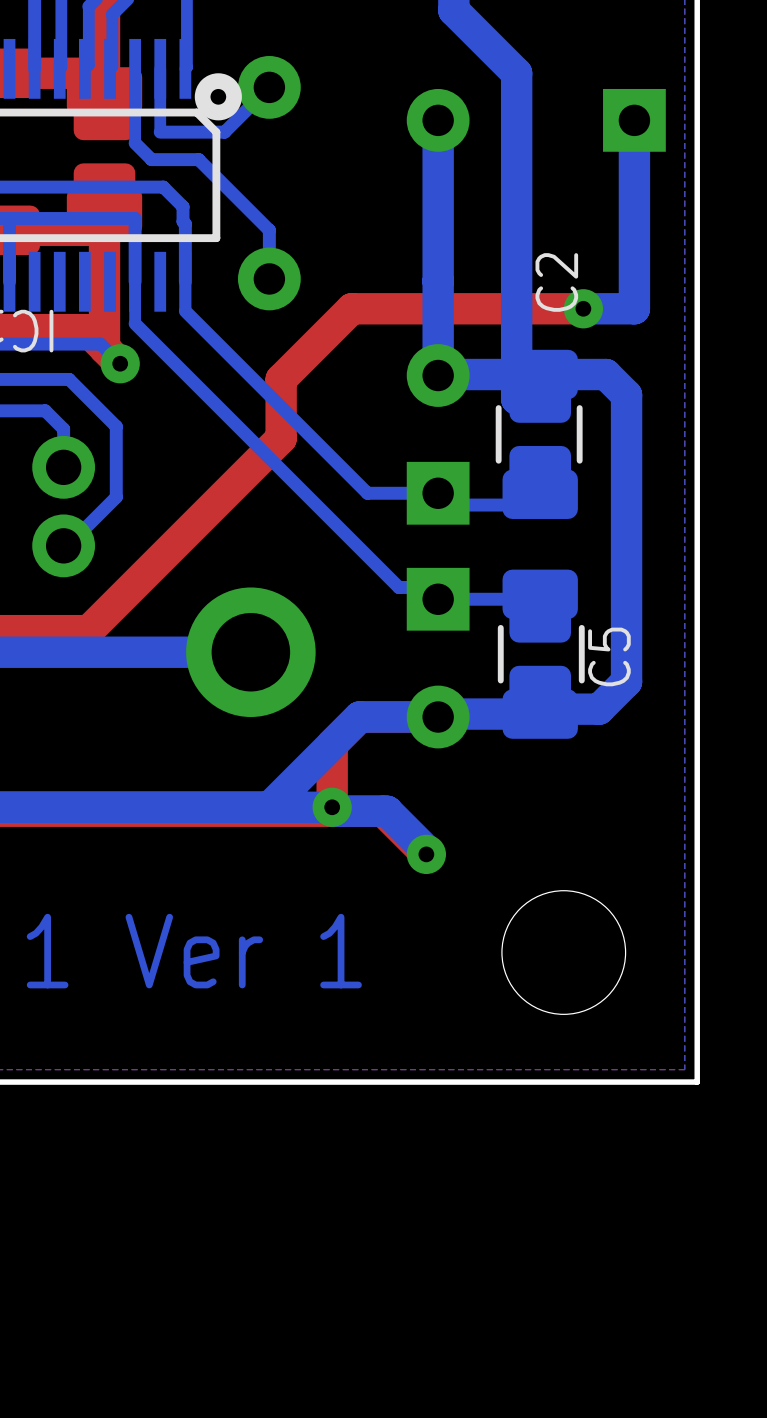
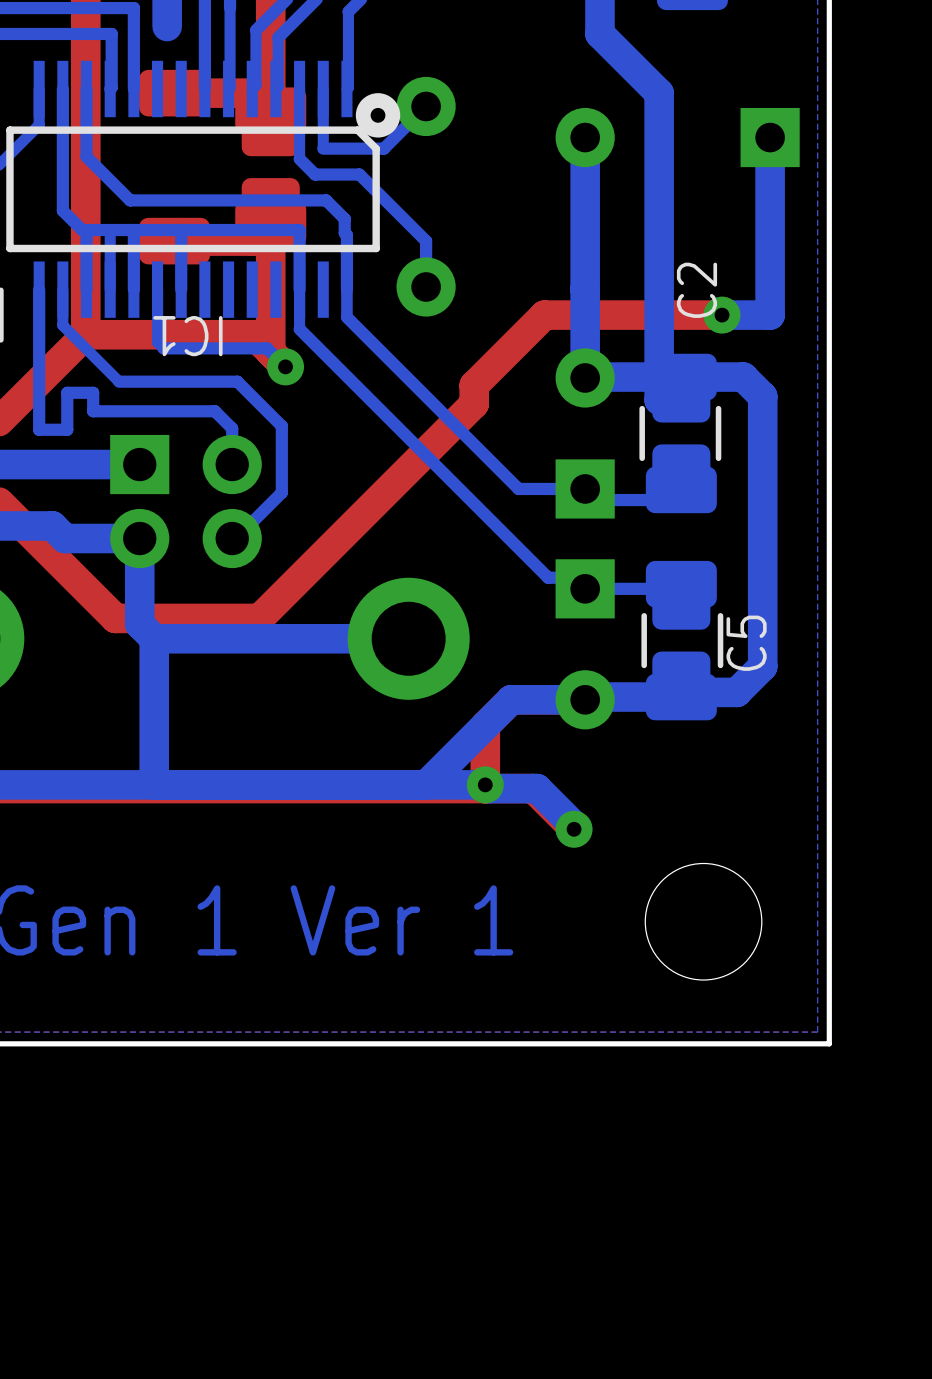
top track: (394, 308) (351, 308) (281, 379) (281, 438) (88, 630) -> (544, 315) (474, 385) (474, 403) (259, 618) (255, 618)

